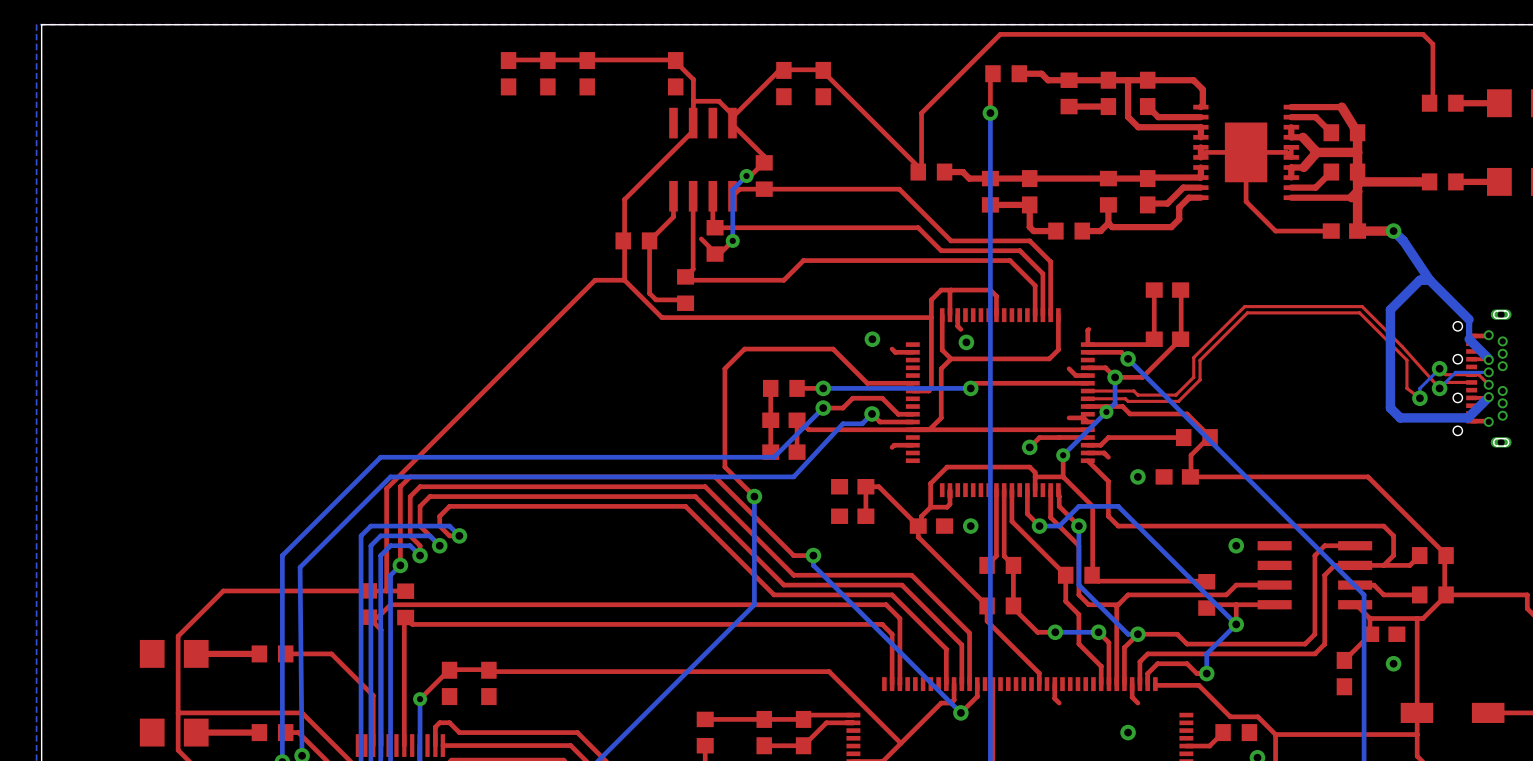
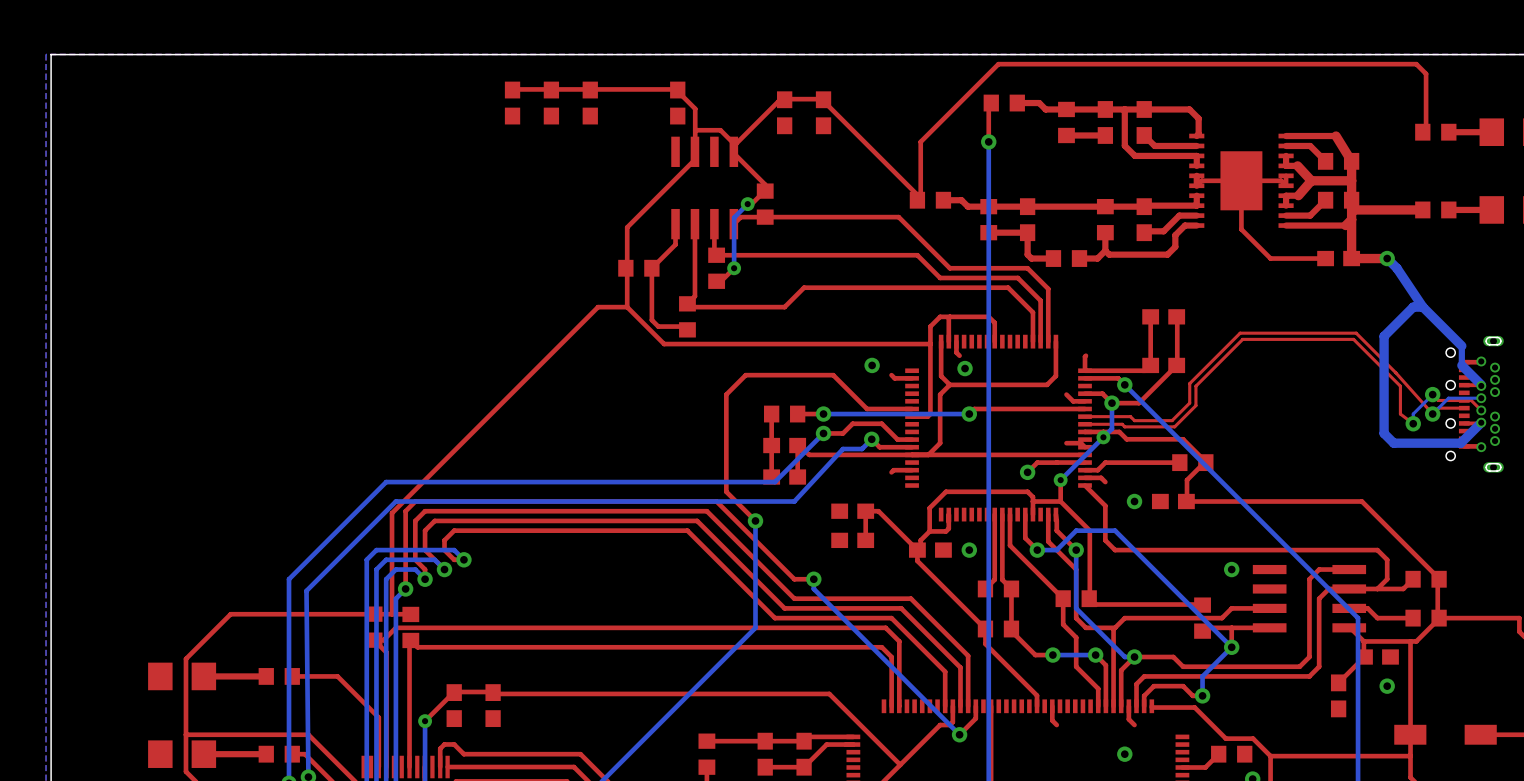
top track: (701, 238) (715, 254) -> none

